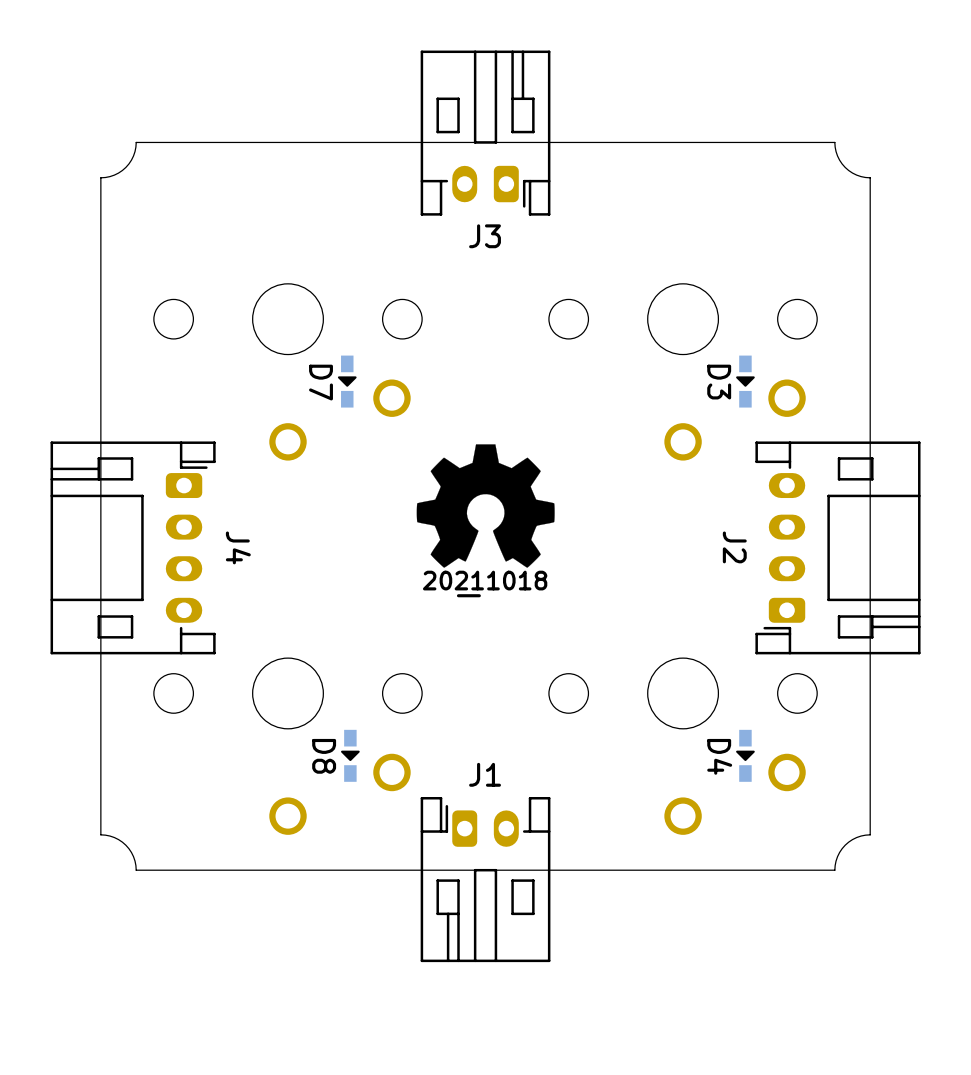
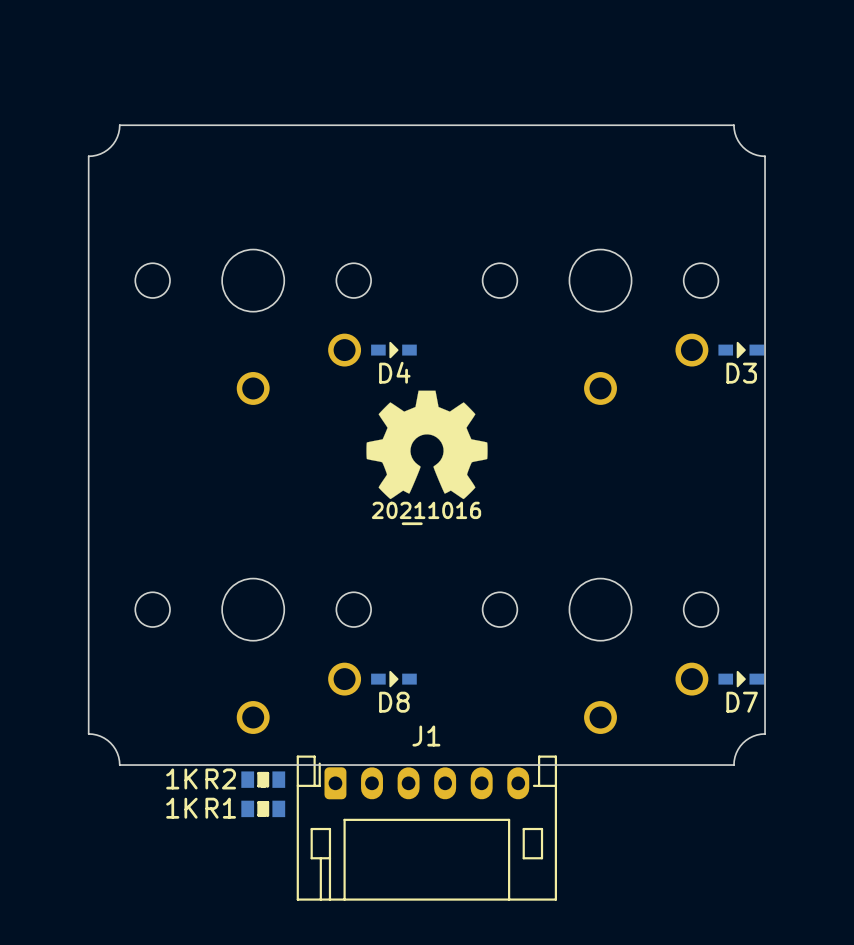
J3: (485, 133) -> none
D7 rotation: 0° (347, 381) -> 90° counterclockwise (741, 679)
D7 position: (347, 381) -> (741, 679)
D3 rotation: 0° (745, 381) -> 90° counterclockwise (741, 350)
D3 position: (745, 381) -> (741, 350)
J4: (133, 547) -> none
J2: (837, 547) -> none
drawing shape: [422, 570, 548, 598] -> [371, 501, 482, 526]
D8 rotation: 0° (350, 755) -> 90° counterclockwise (393, 679)
D8 position: (350, 755) -> (393, 679)
D4 rotation: 0° (745, 755) -> 90° counterclockwise (393, 350)
D4 position: (745, 755) -> (393, 350)
J1 footprint: [420, 797, 551, 963] -> [296, 755, 558, 901]
R2: none -> 1K (263, 779)
R1: none -> 1K (263, 808)

